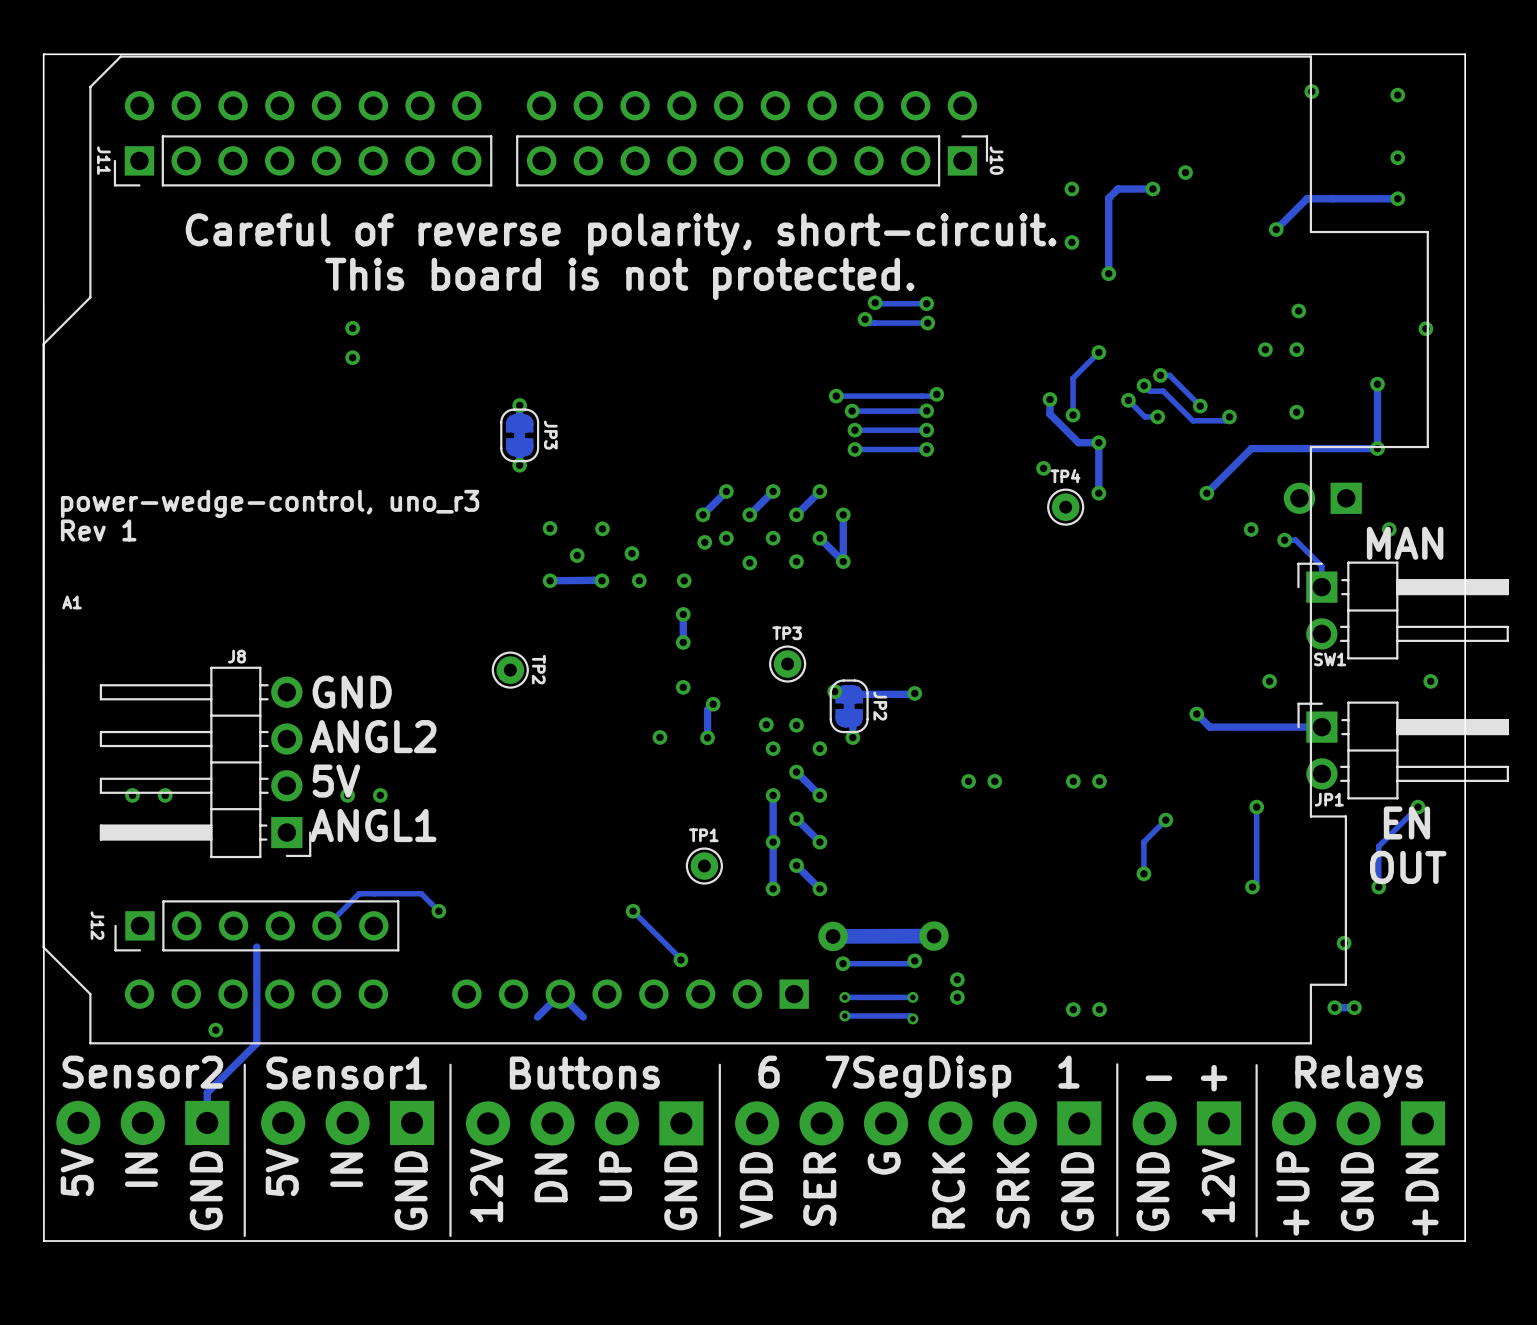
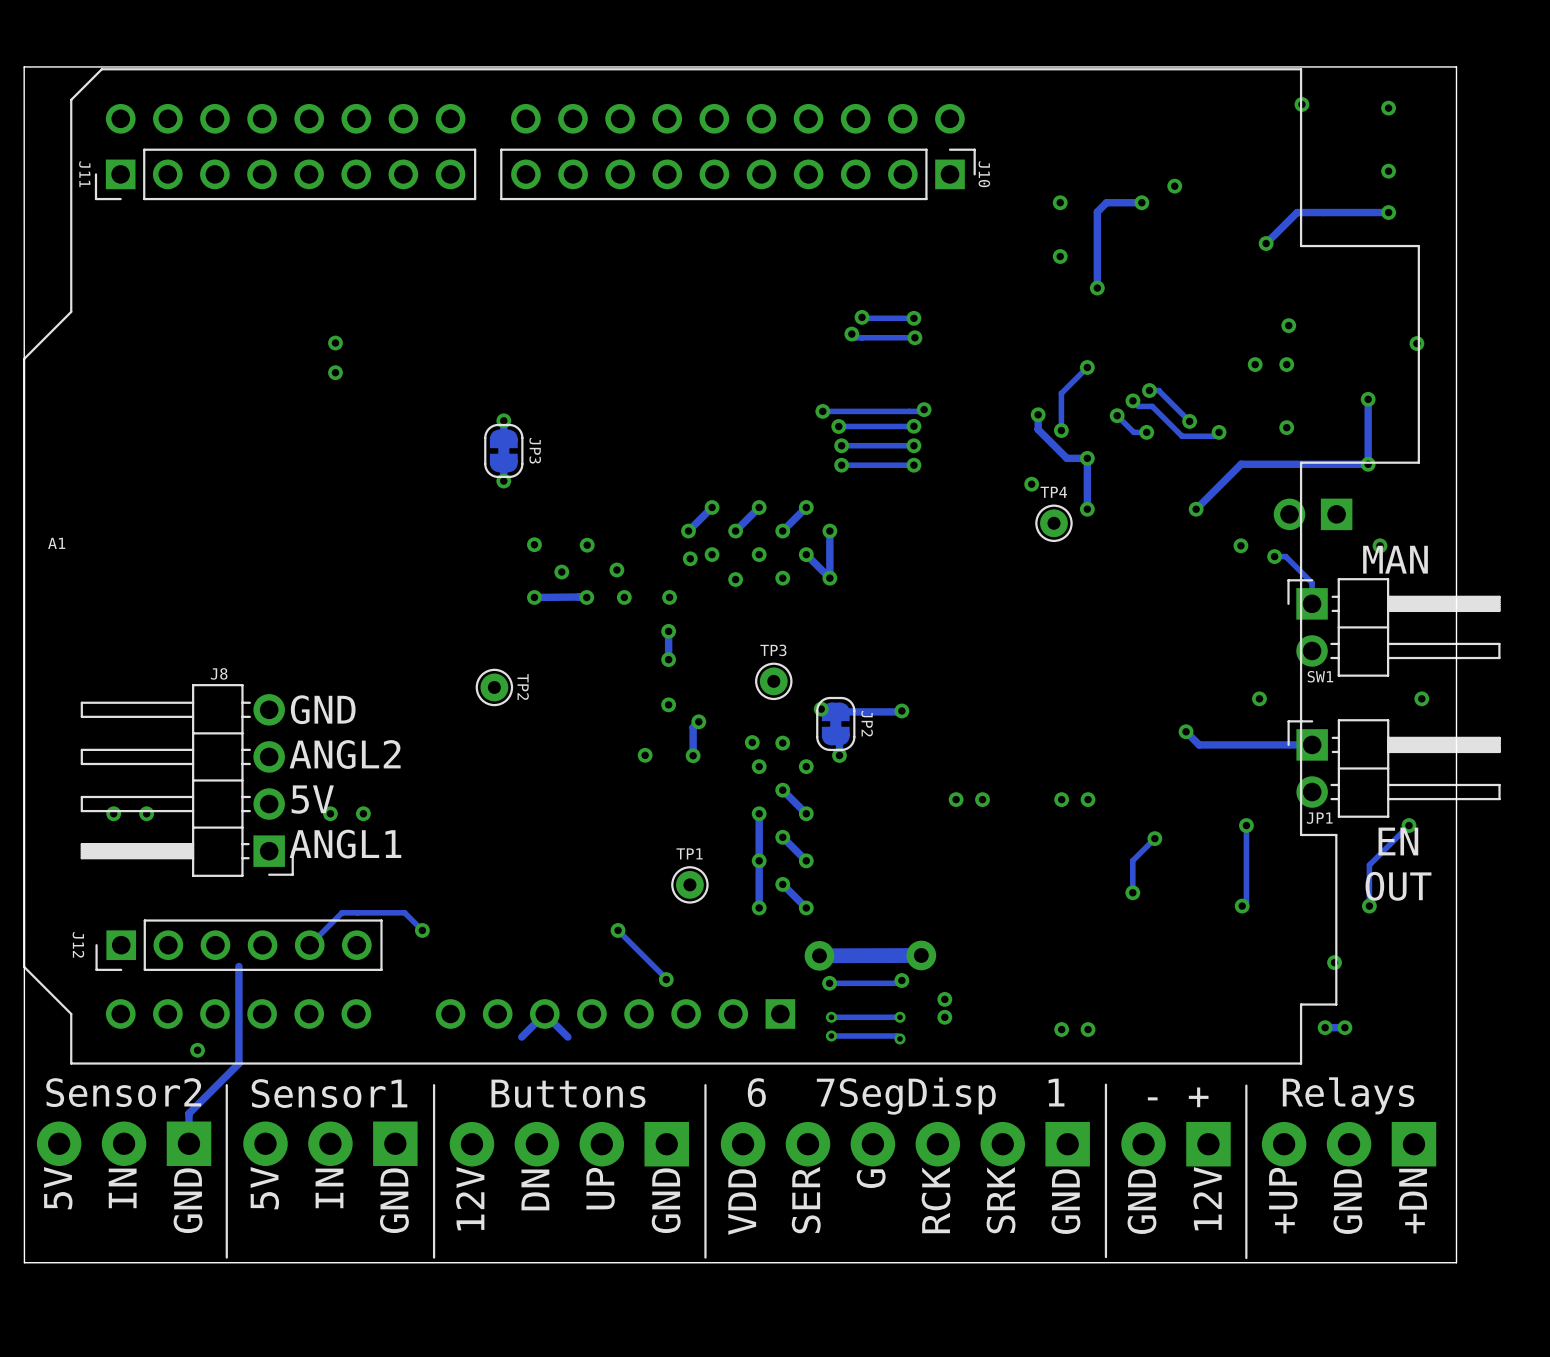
text: Careful of reverse polarity, short-circuit. (621, 234) -> none
text: This board is not protected. (619, 278) -> none
text: power-wedge-control, uno_r3 (270, 503) -> none
text: Rev 1 (98, 530) -> none
A1 name position: A1 (71, 602) -> A1 (56, 543)

